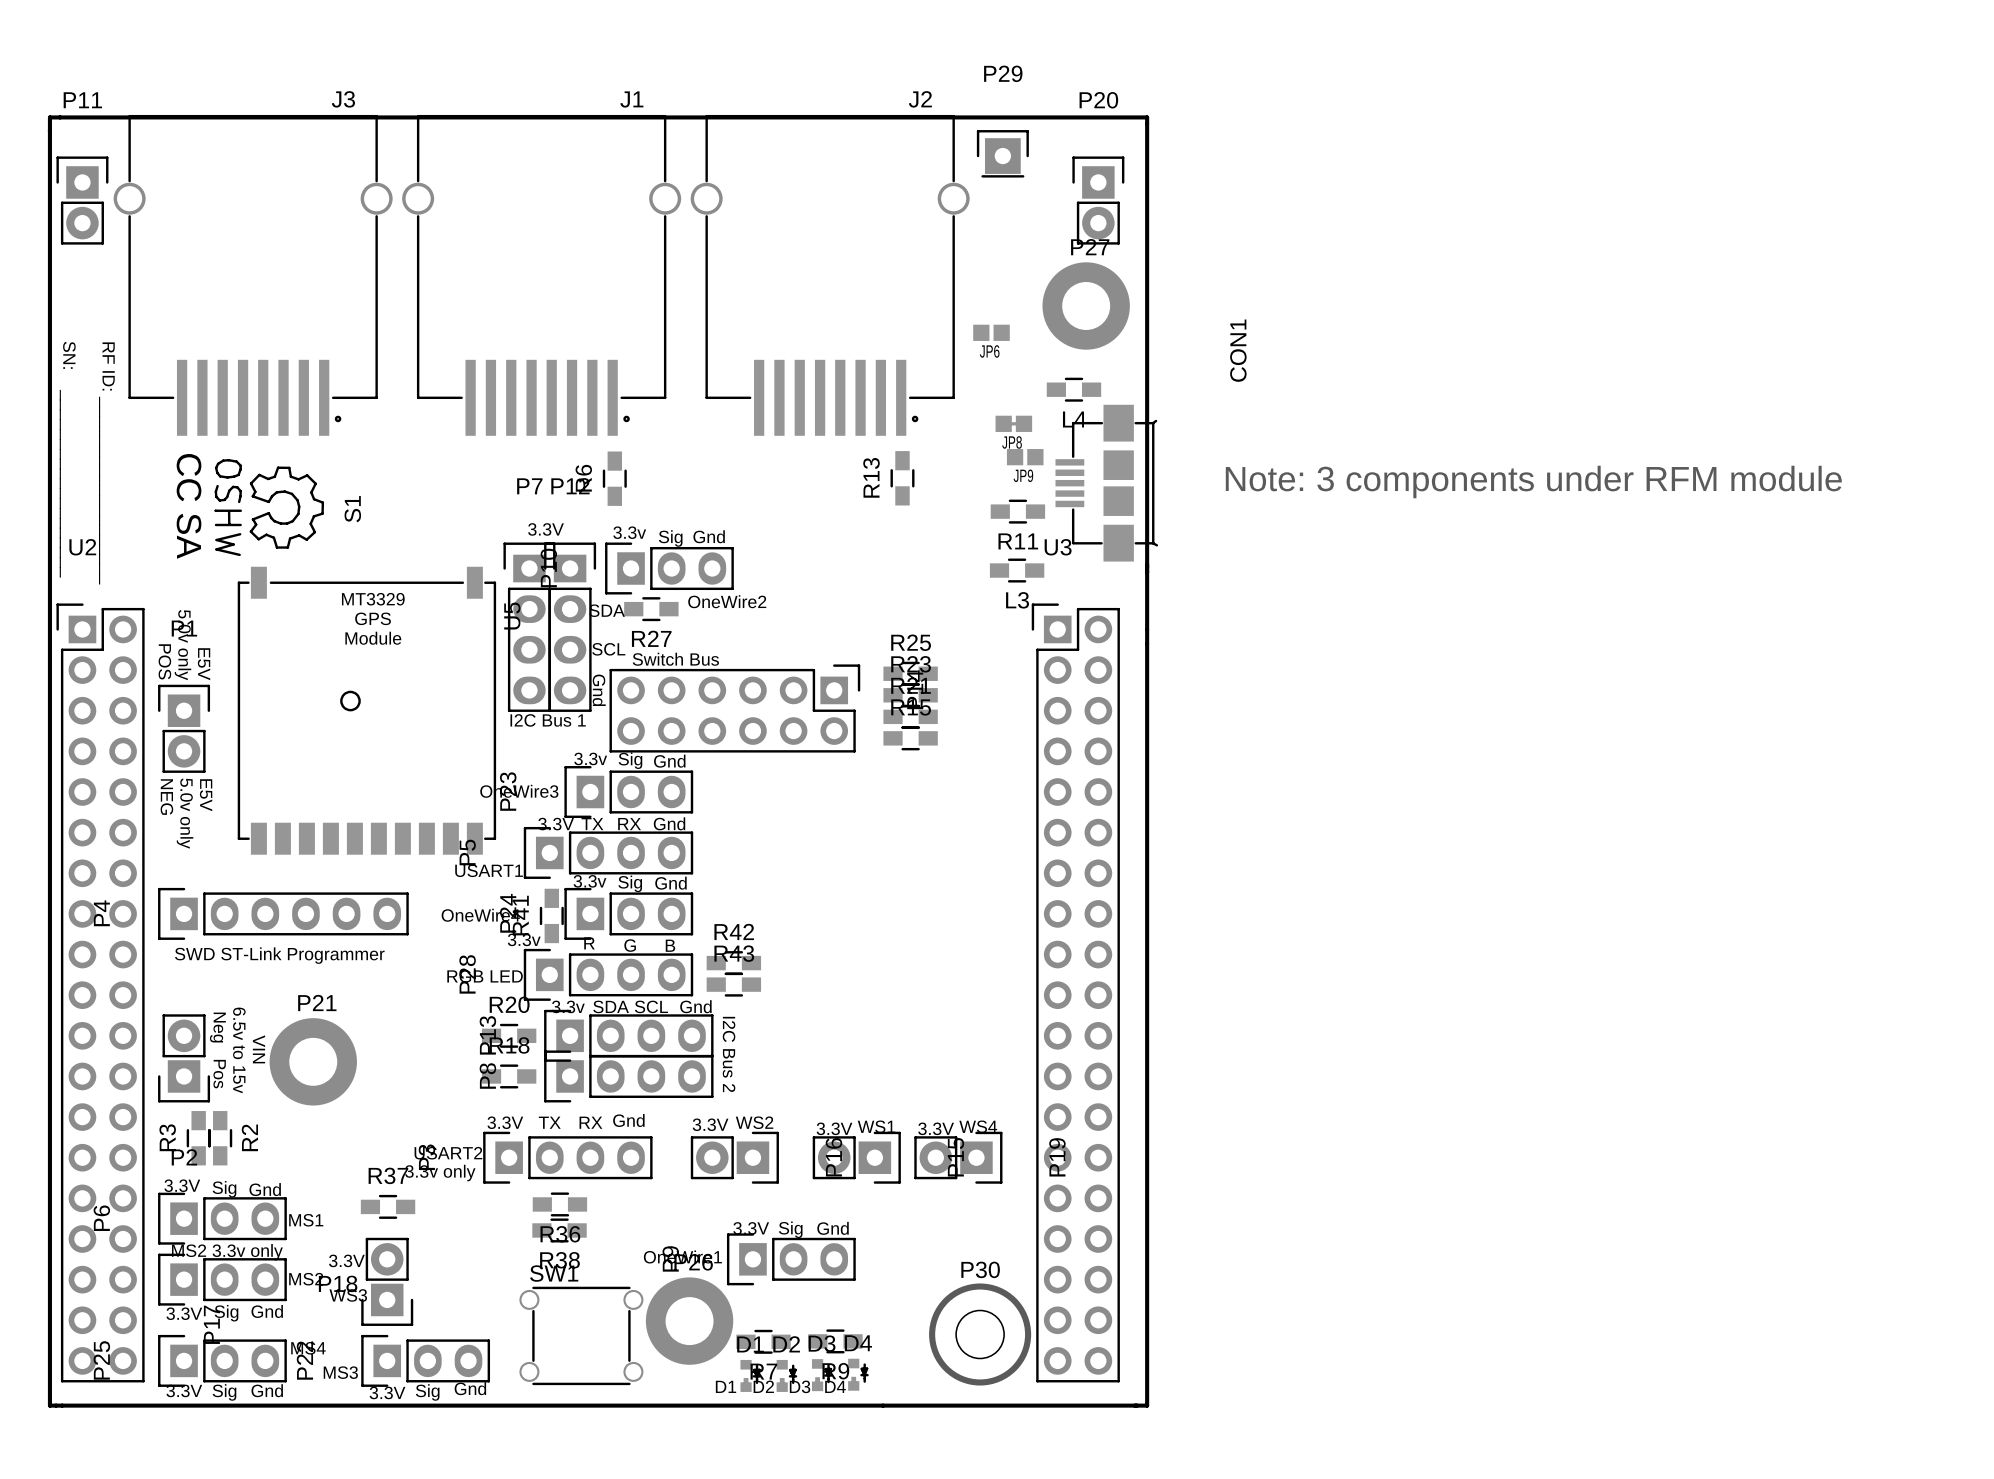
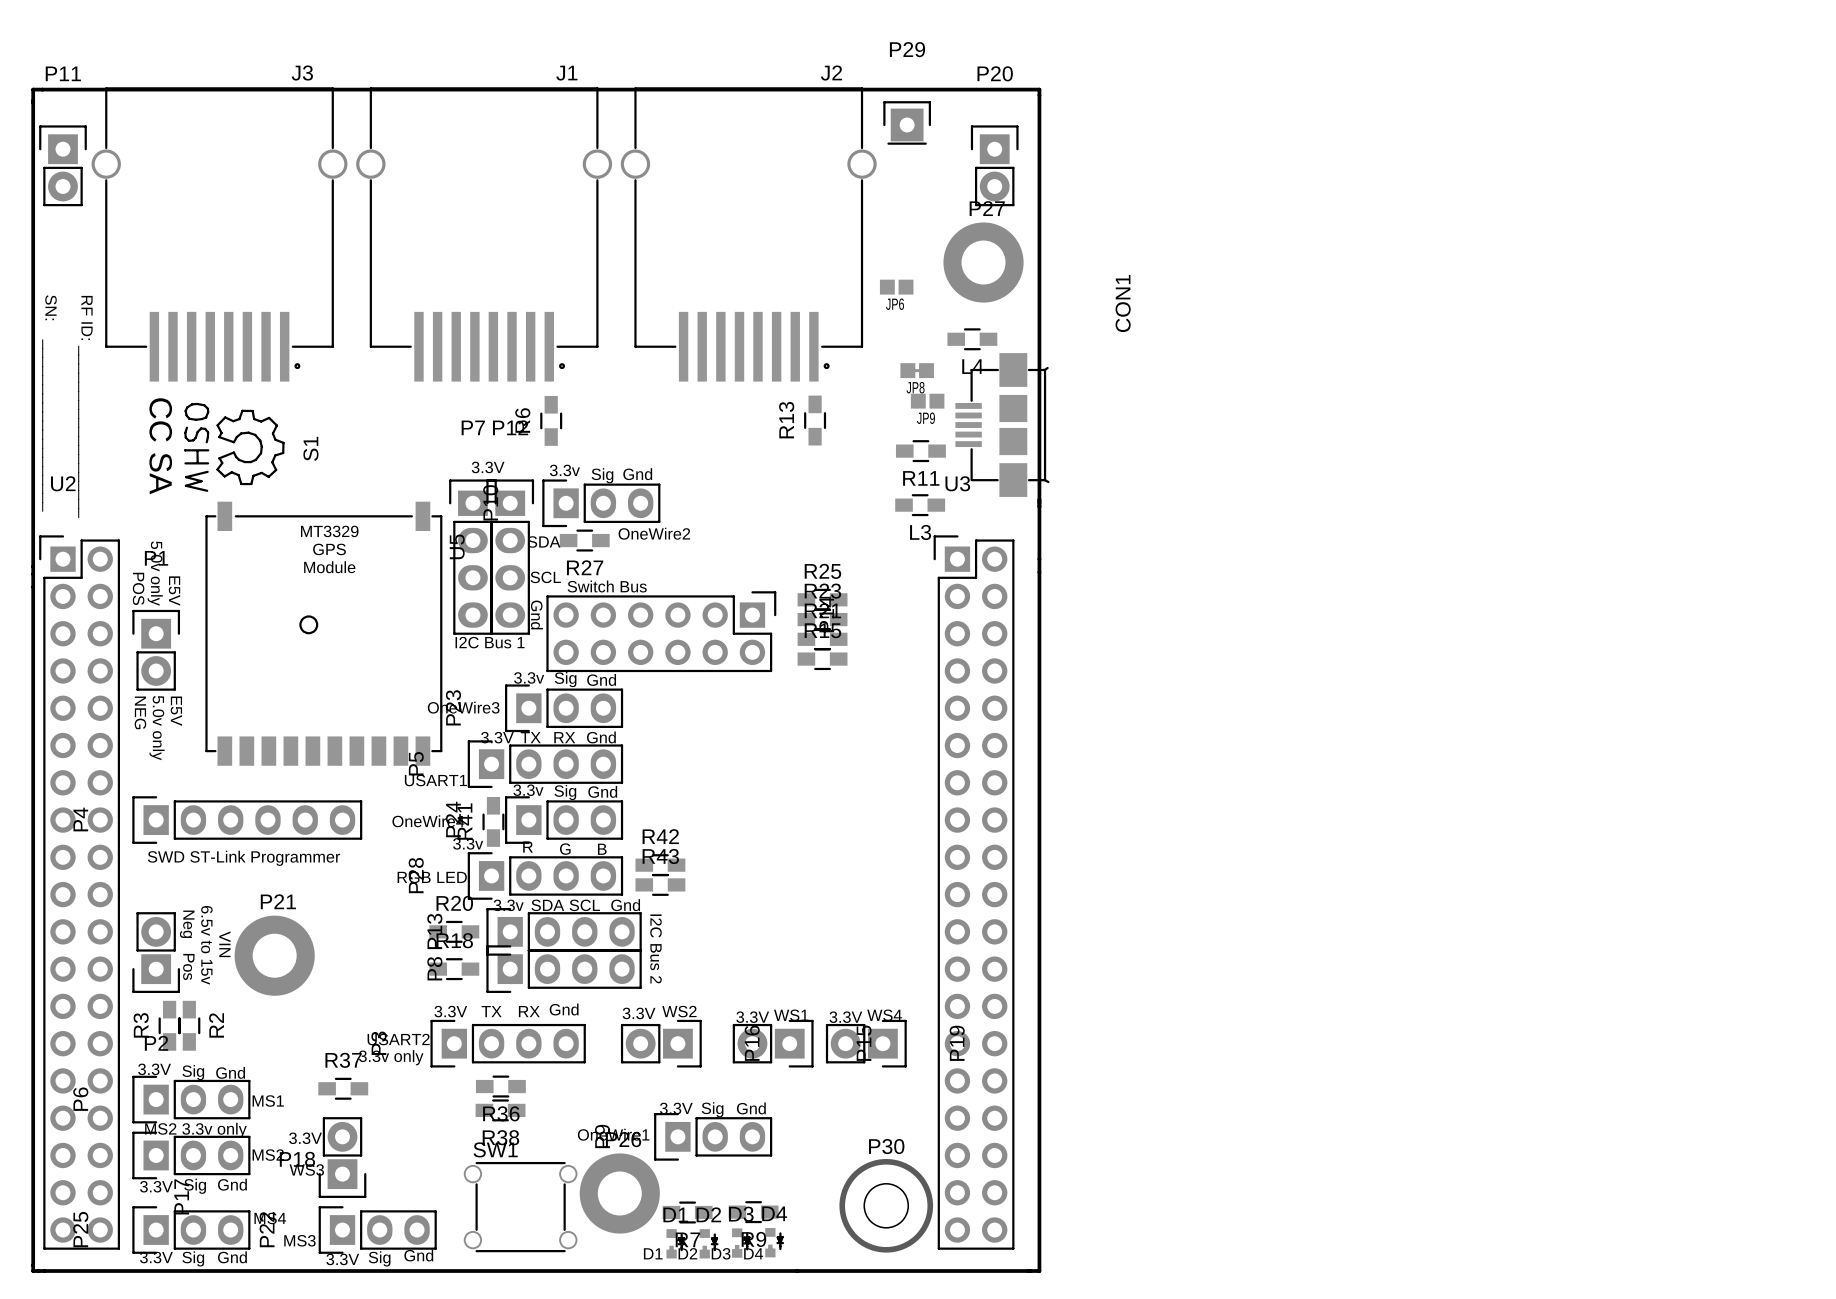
text: Note: 3 components under RFM module (1533, 482) -> none

